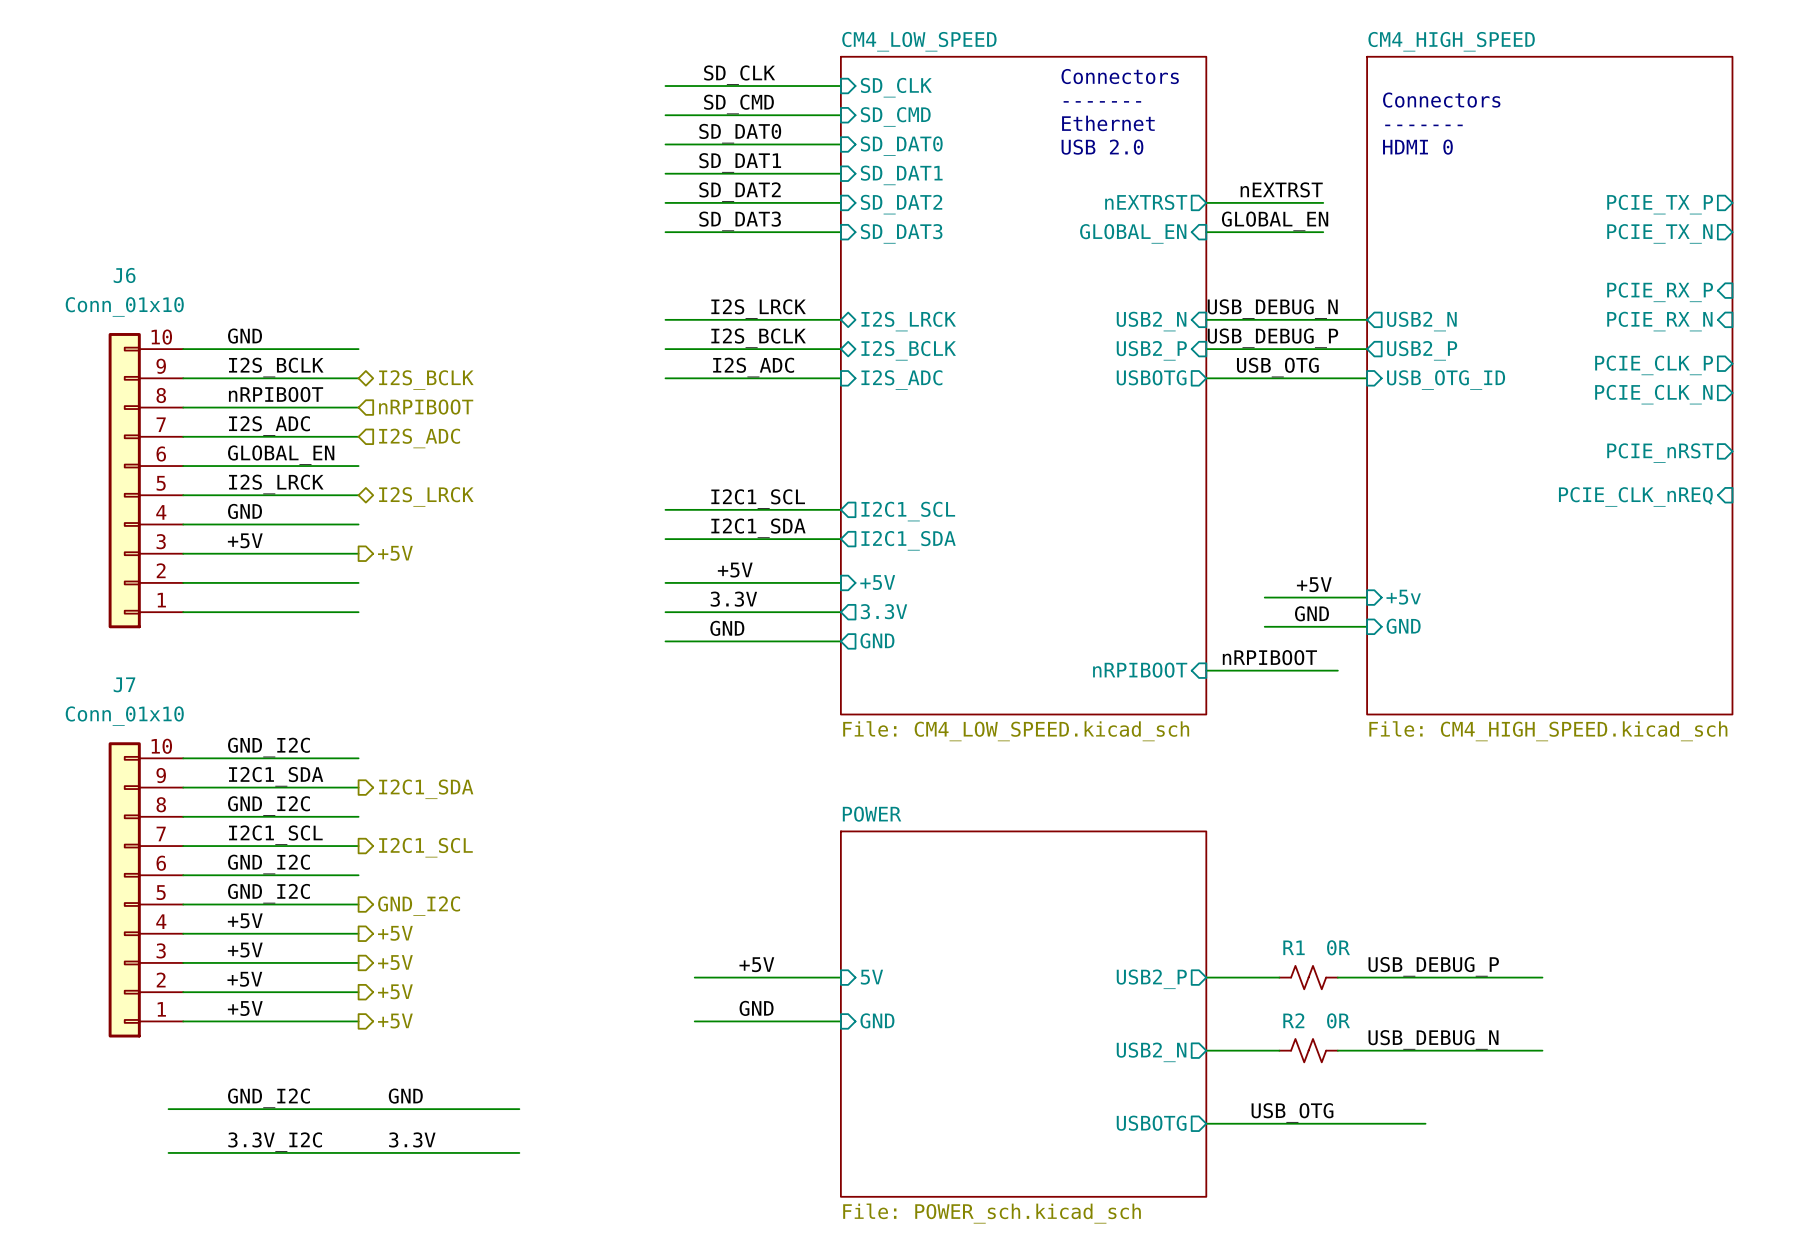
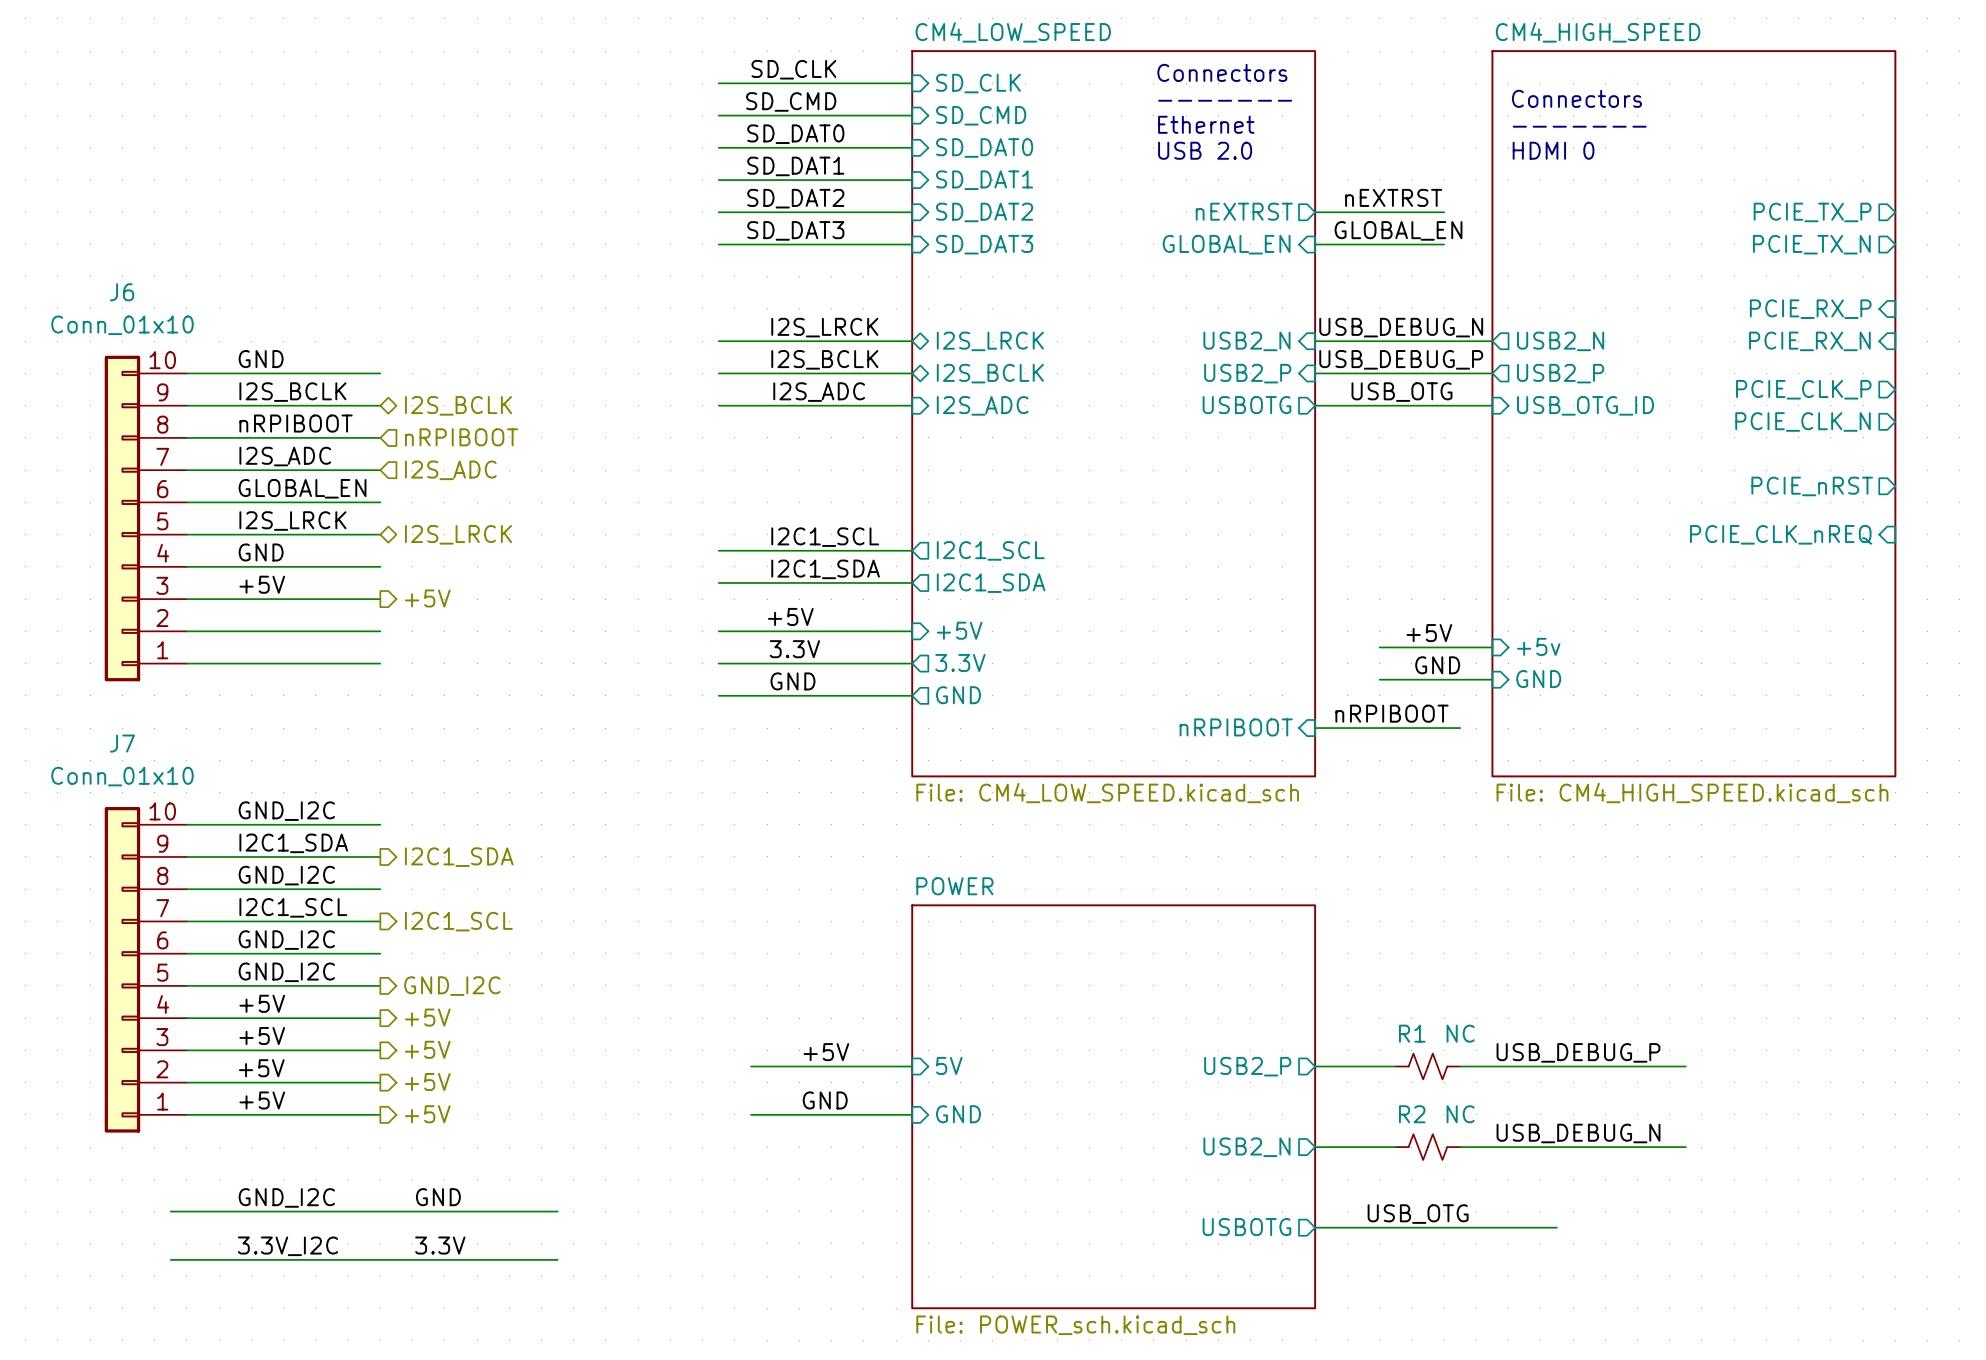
R1 value: 0R (1338, 947) -> NC (1460, 1033)
R2 value: 0R (1338, 1020) -> NC (1460, 1114)

